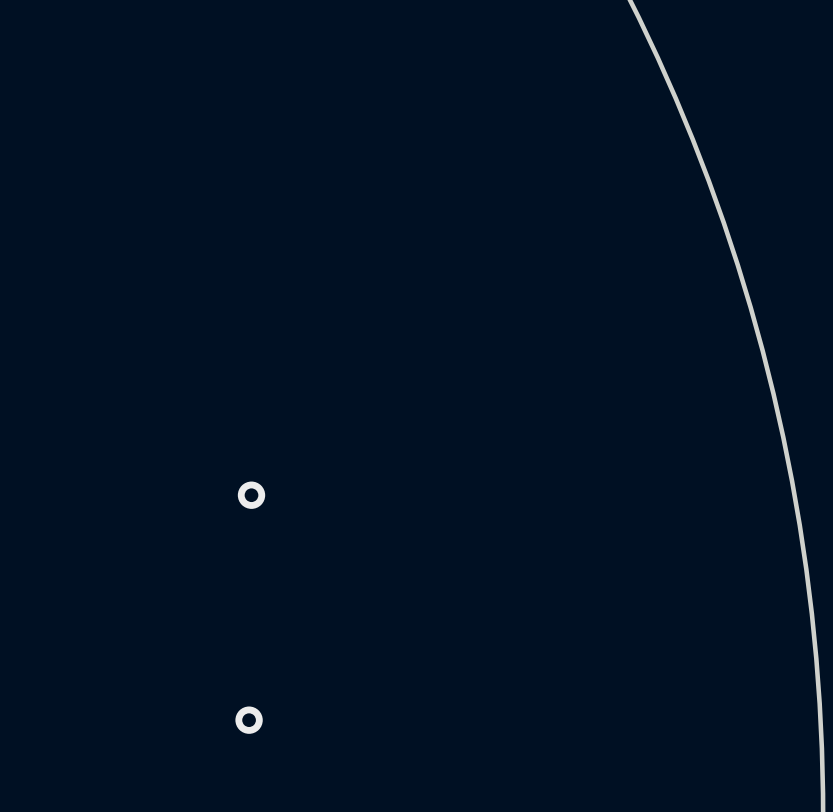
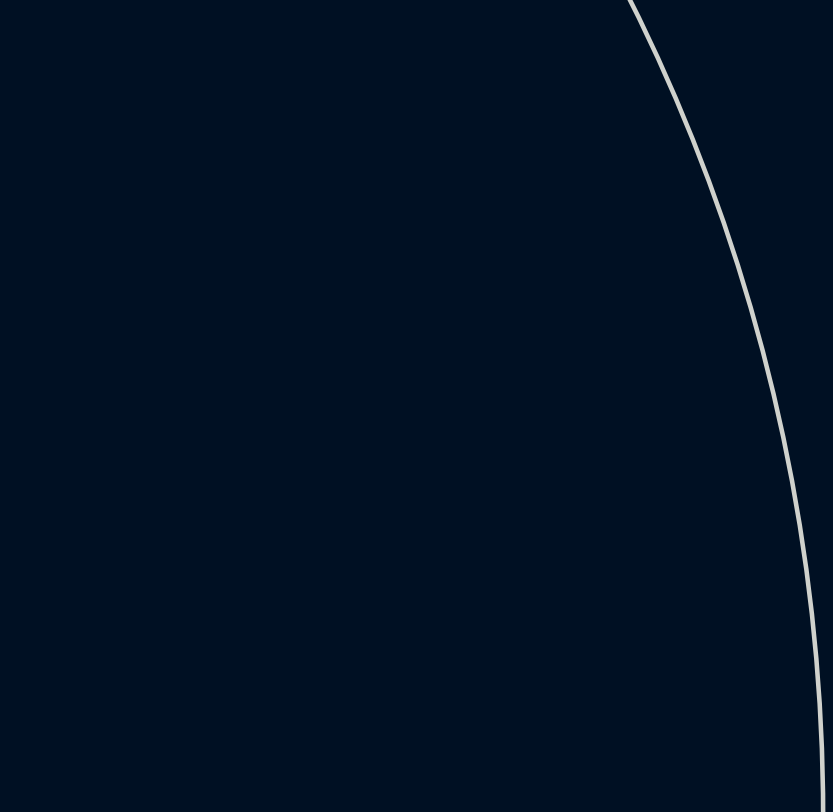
via: (251, 495) -> none
via: (249, 720) -> none

